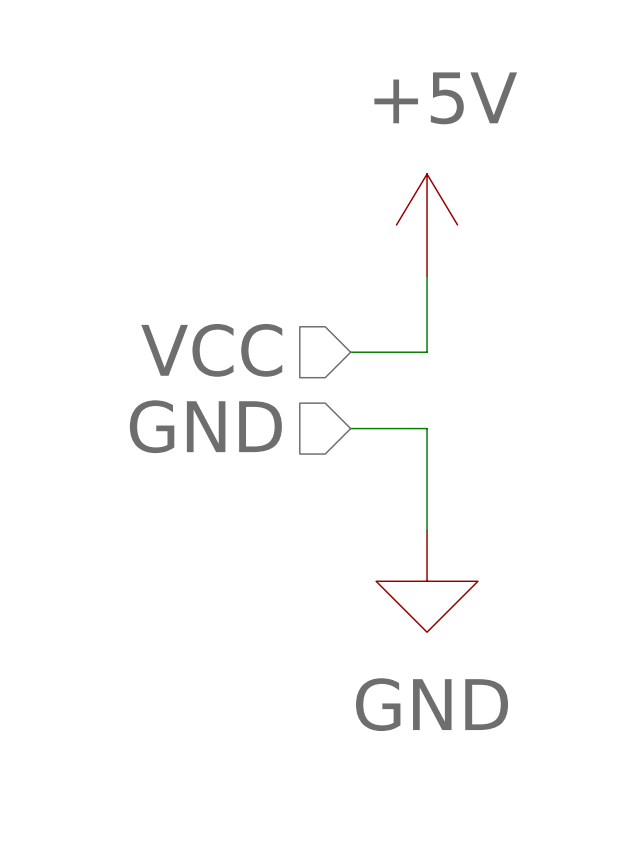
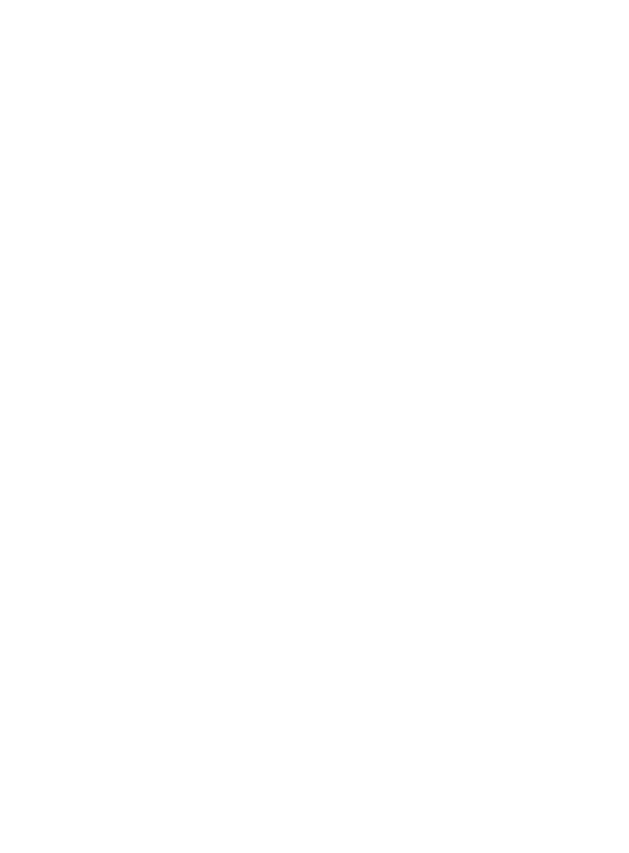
power symbol: +5V (427, 224) -> none
wire: (427, 275) (427, 352) (350, 352) -> none
hierarchical label: VCC (211, 350) -> none
hierarchical label: GND (205, 426) -> none
wire: (350, 428) (427, 428) (427, 530) -> none
power symbol: GND (427, 581) -> none

